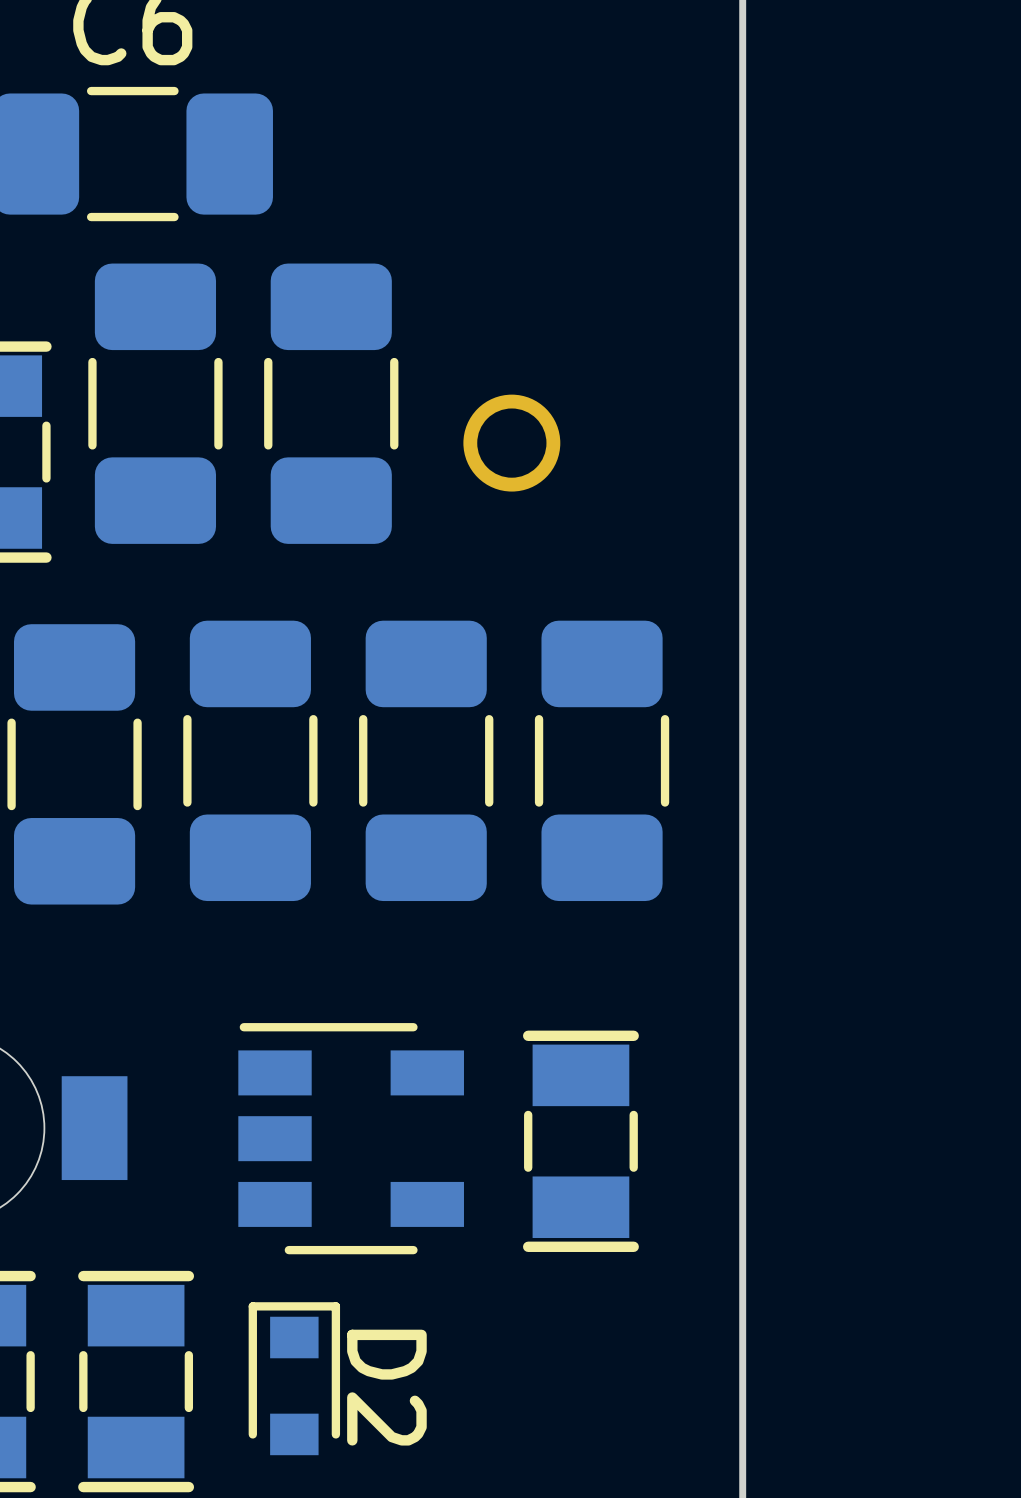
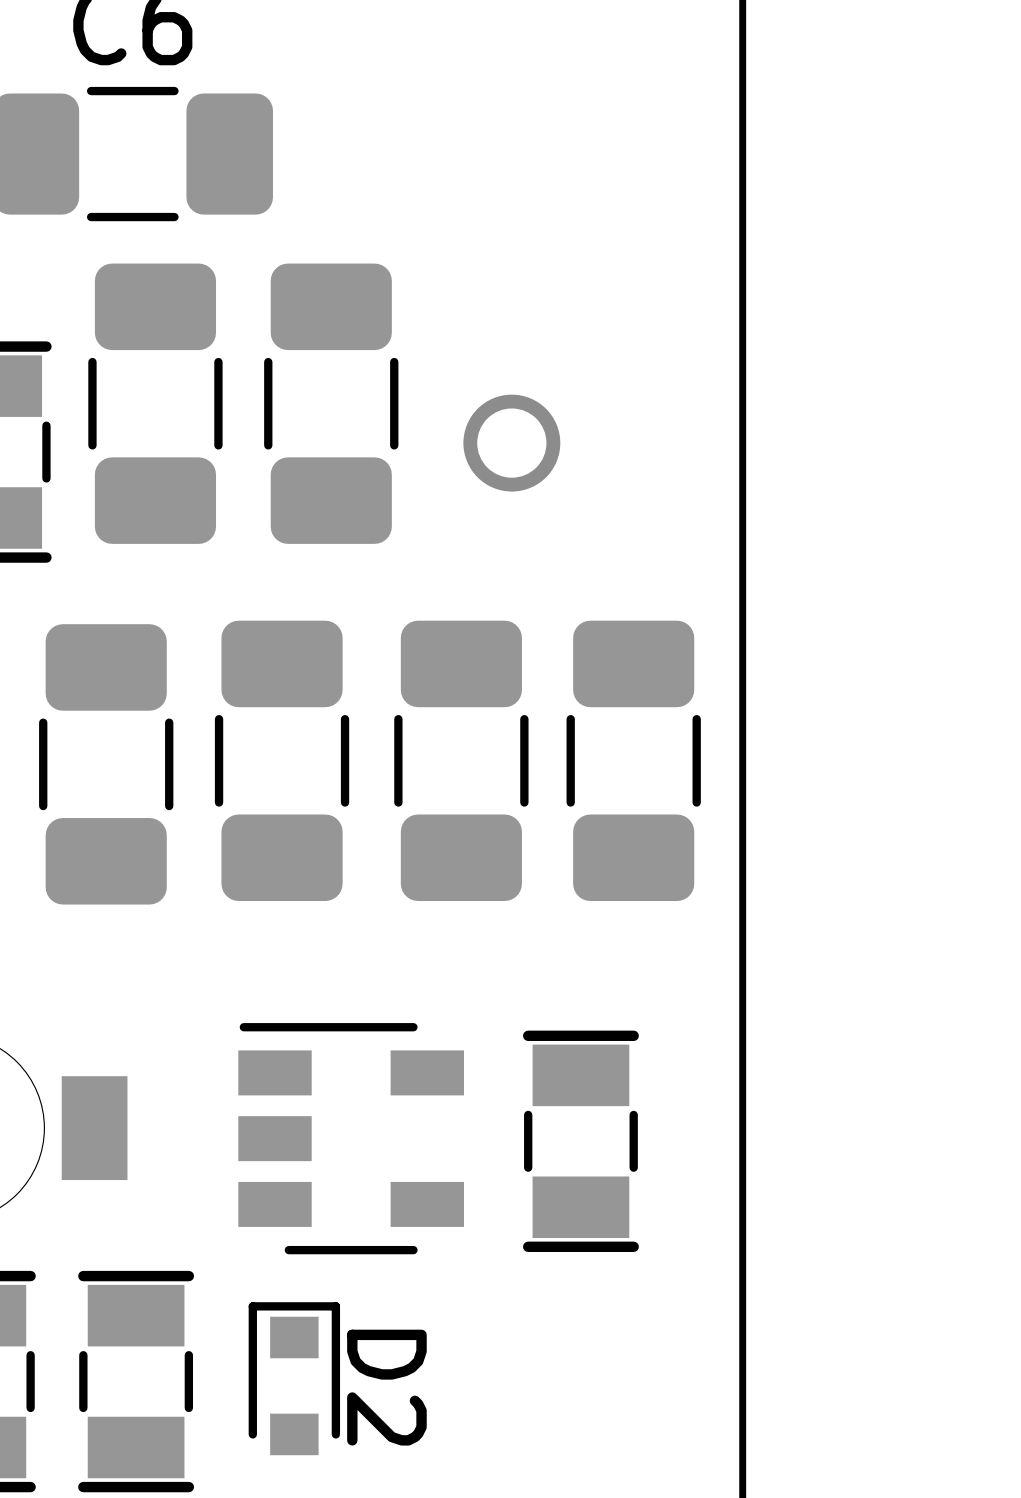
part position: (250, 760) -> (282, 760)
part position: (426, 760) -> (461, 760)
part position: (602, 760) -> (633, 760)
part position: (74, 764) -> (106, 764)

